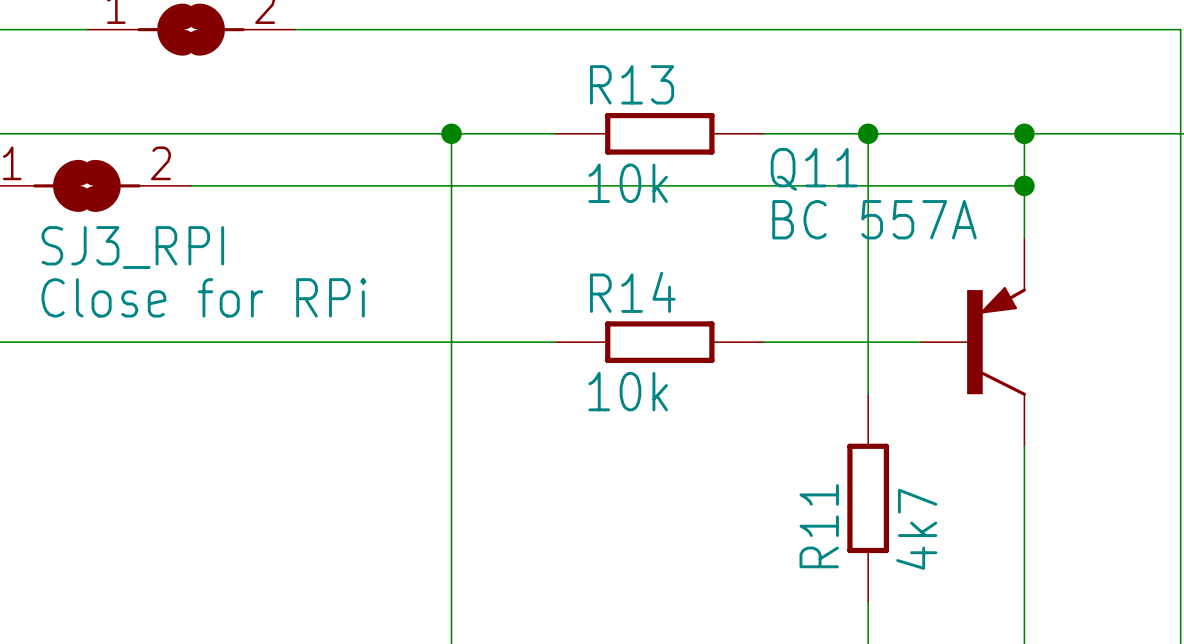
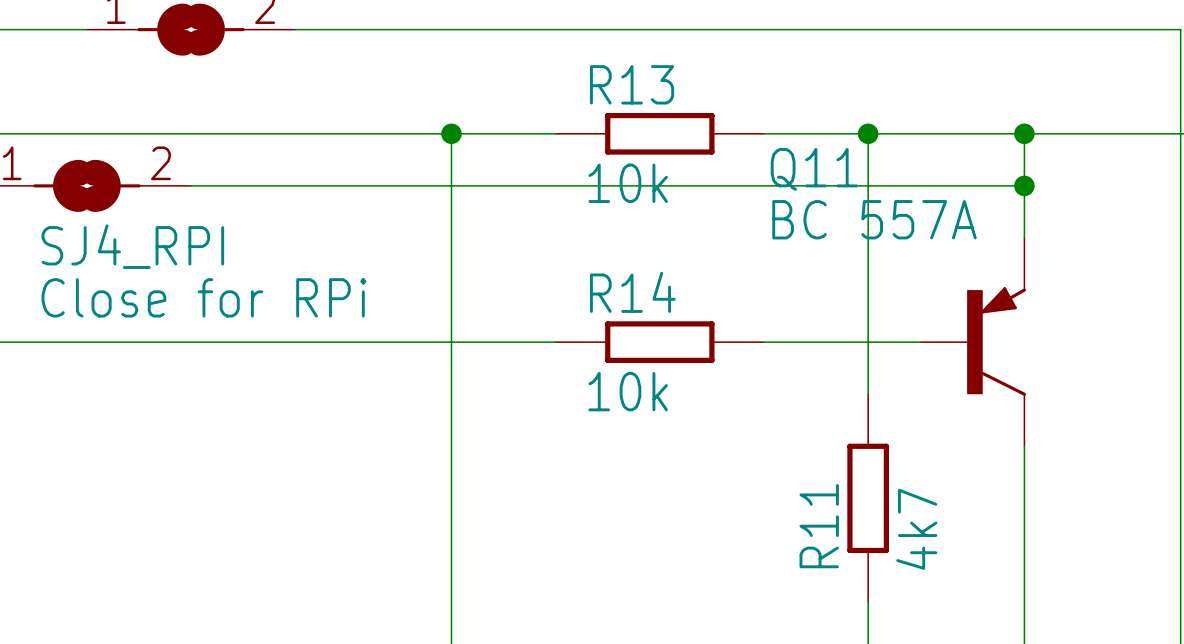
SJ3_RPI name: SJ3_RPI (132, 247) -> SJ4_RPI (132, 246)

